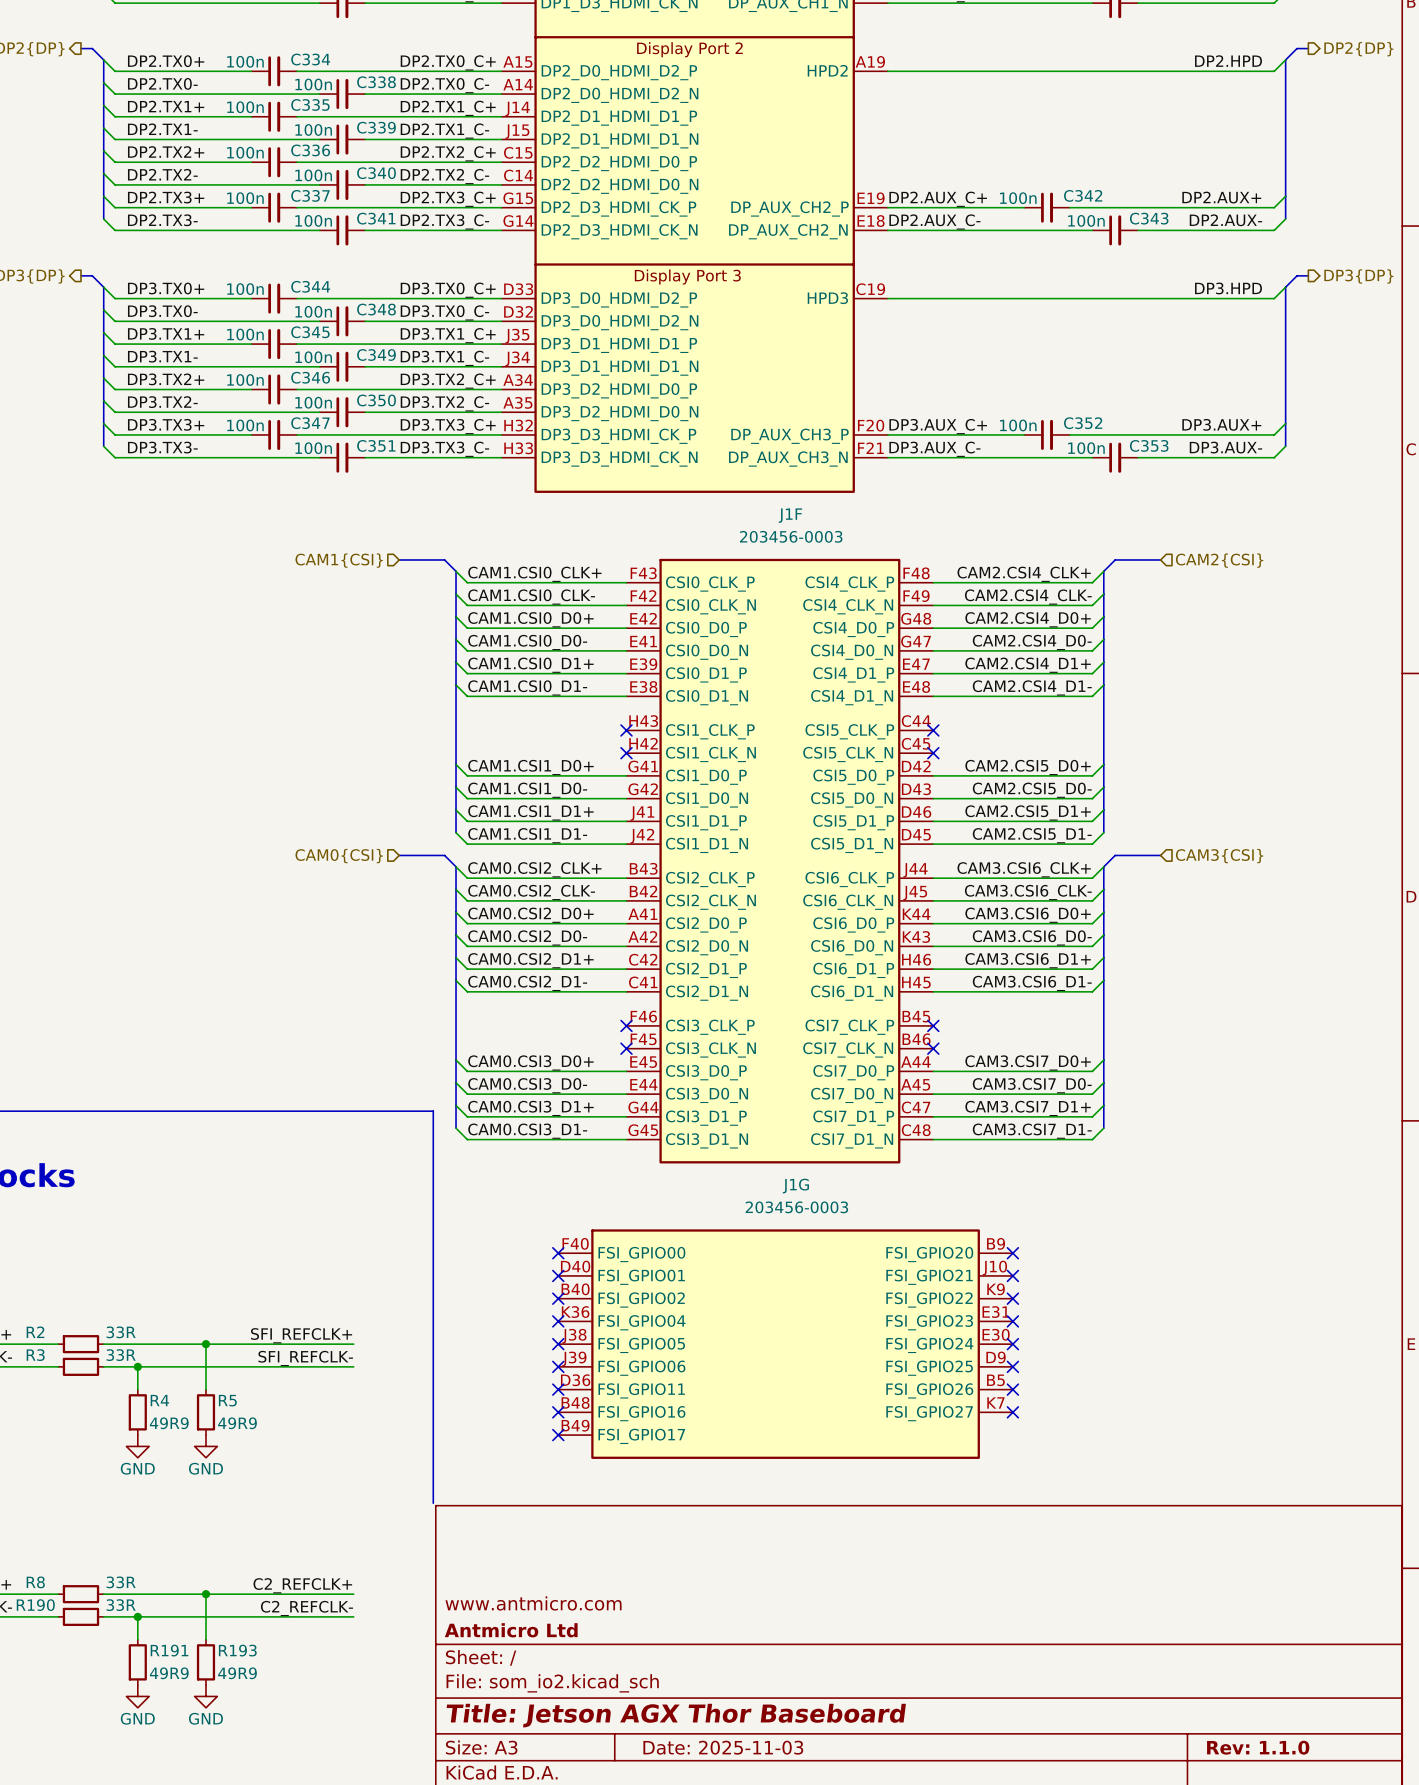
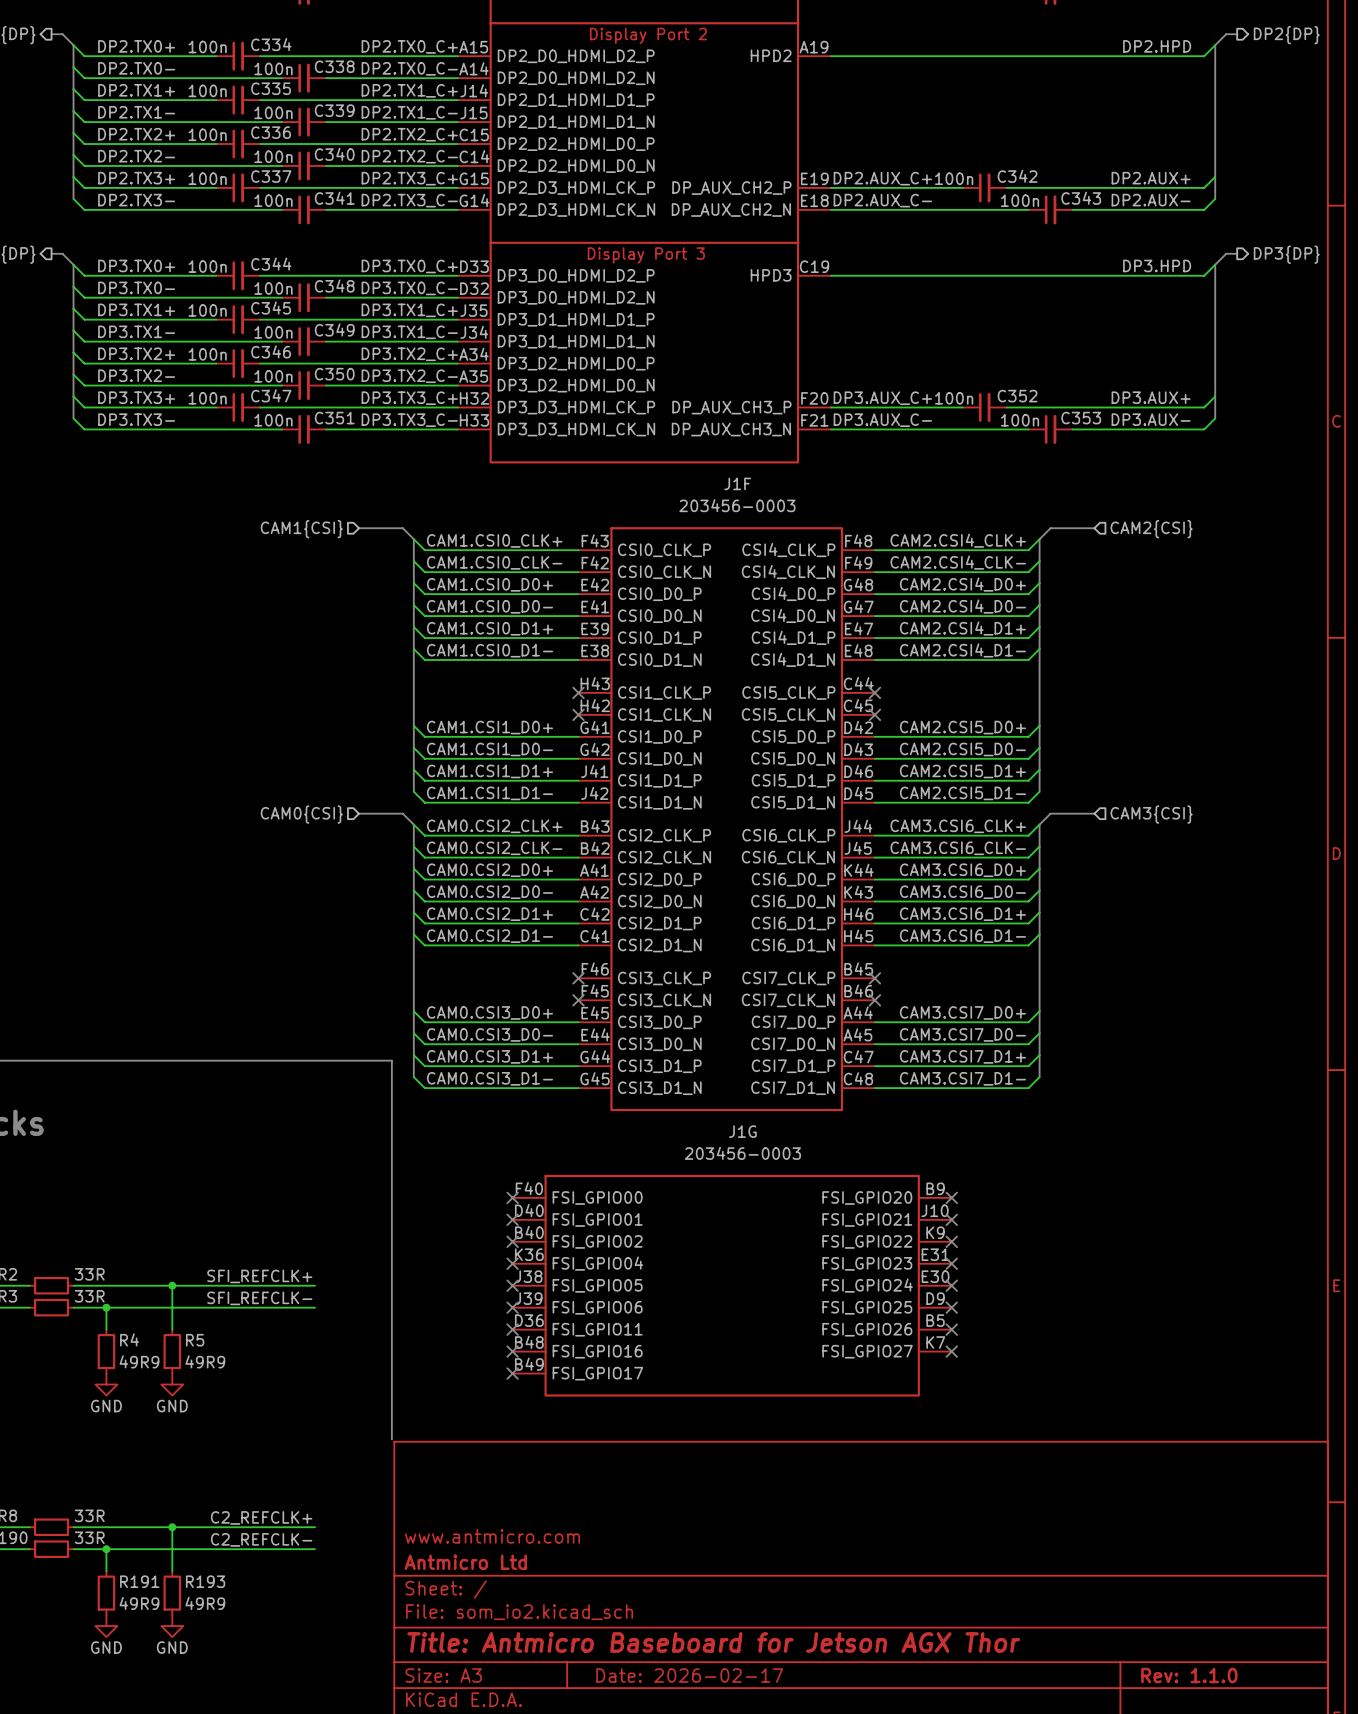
title block: Title: Jetson AGX Thor Baseboard (676, 1715) -> Title: Antmicro Baseboard for Jetson AGX Thor (713, 1642)
title block: Date: 2025-11-03 (723, 1747) -> Date: 2026-02-17 (689, 1675)

